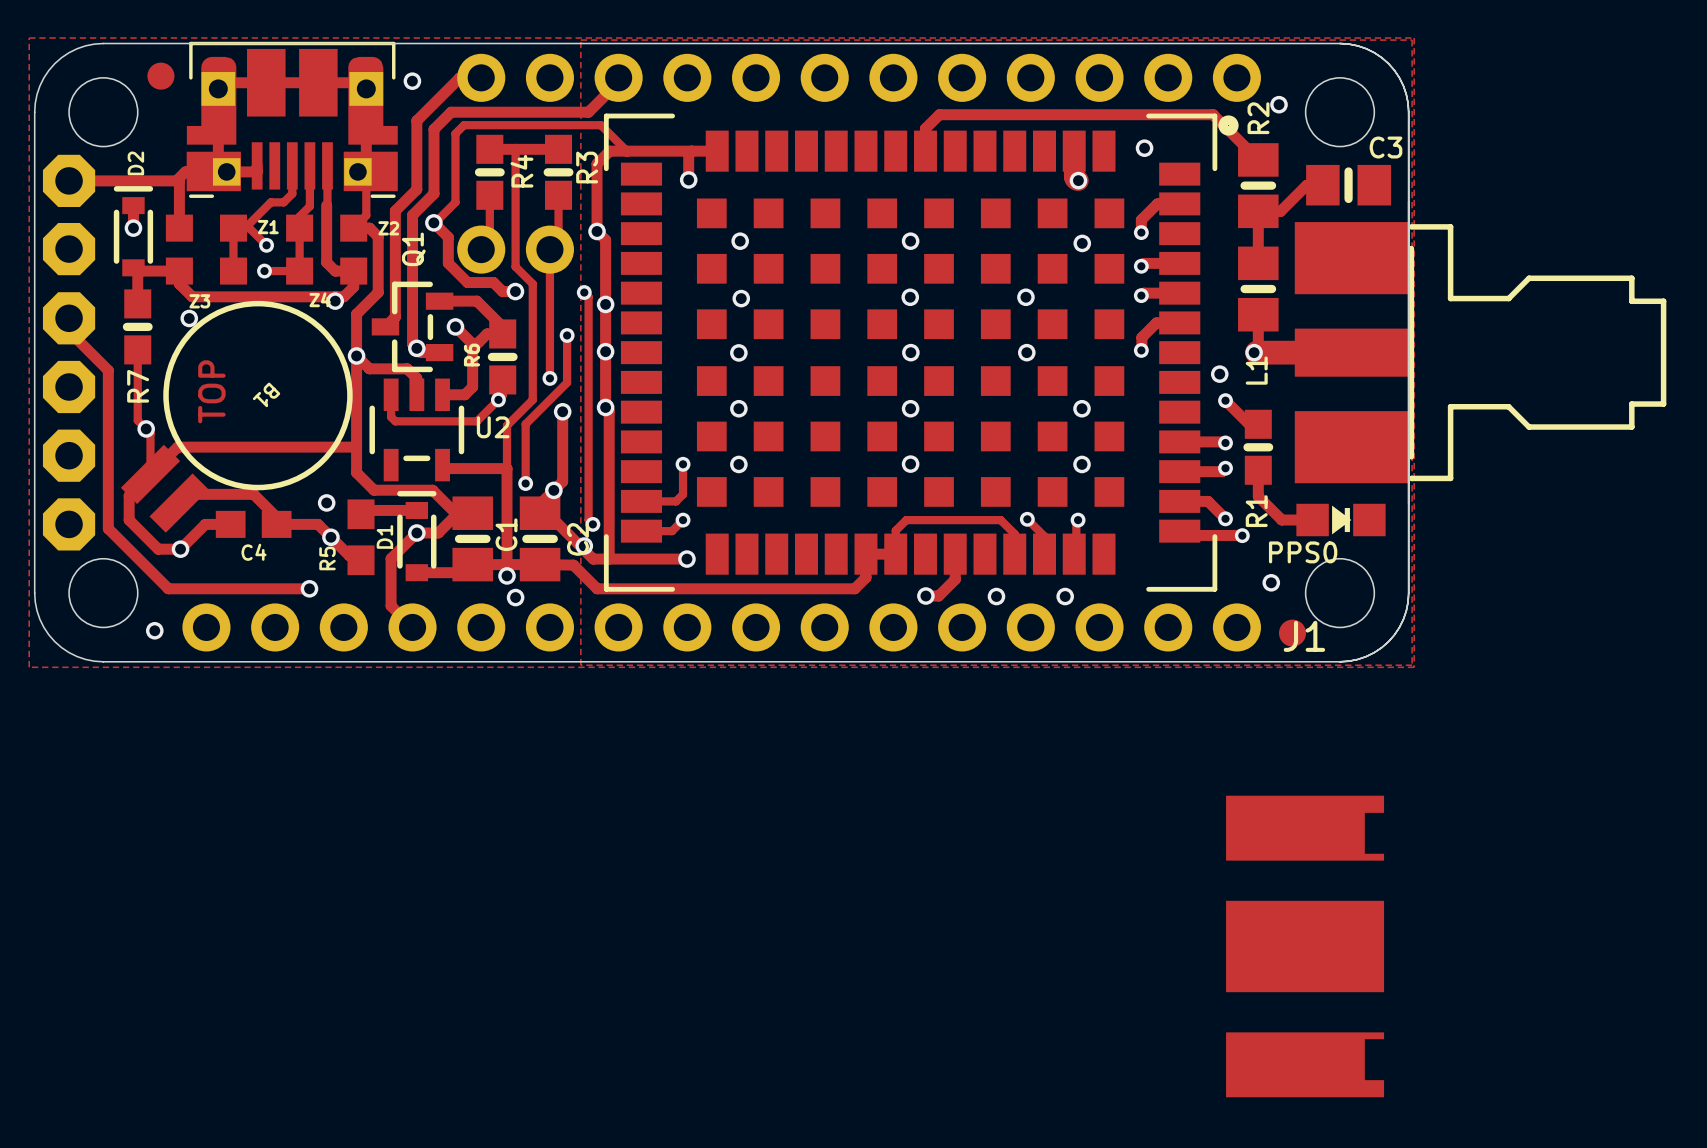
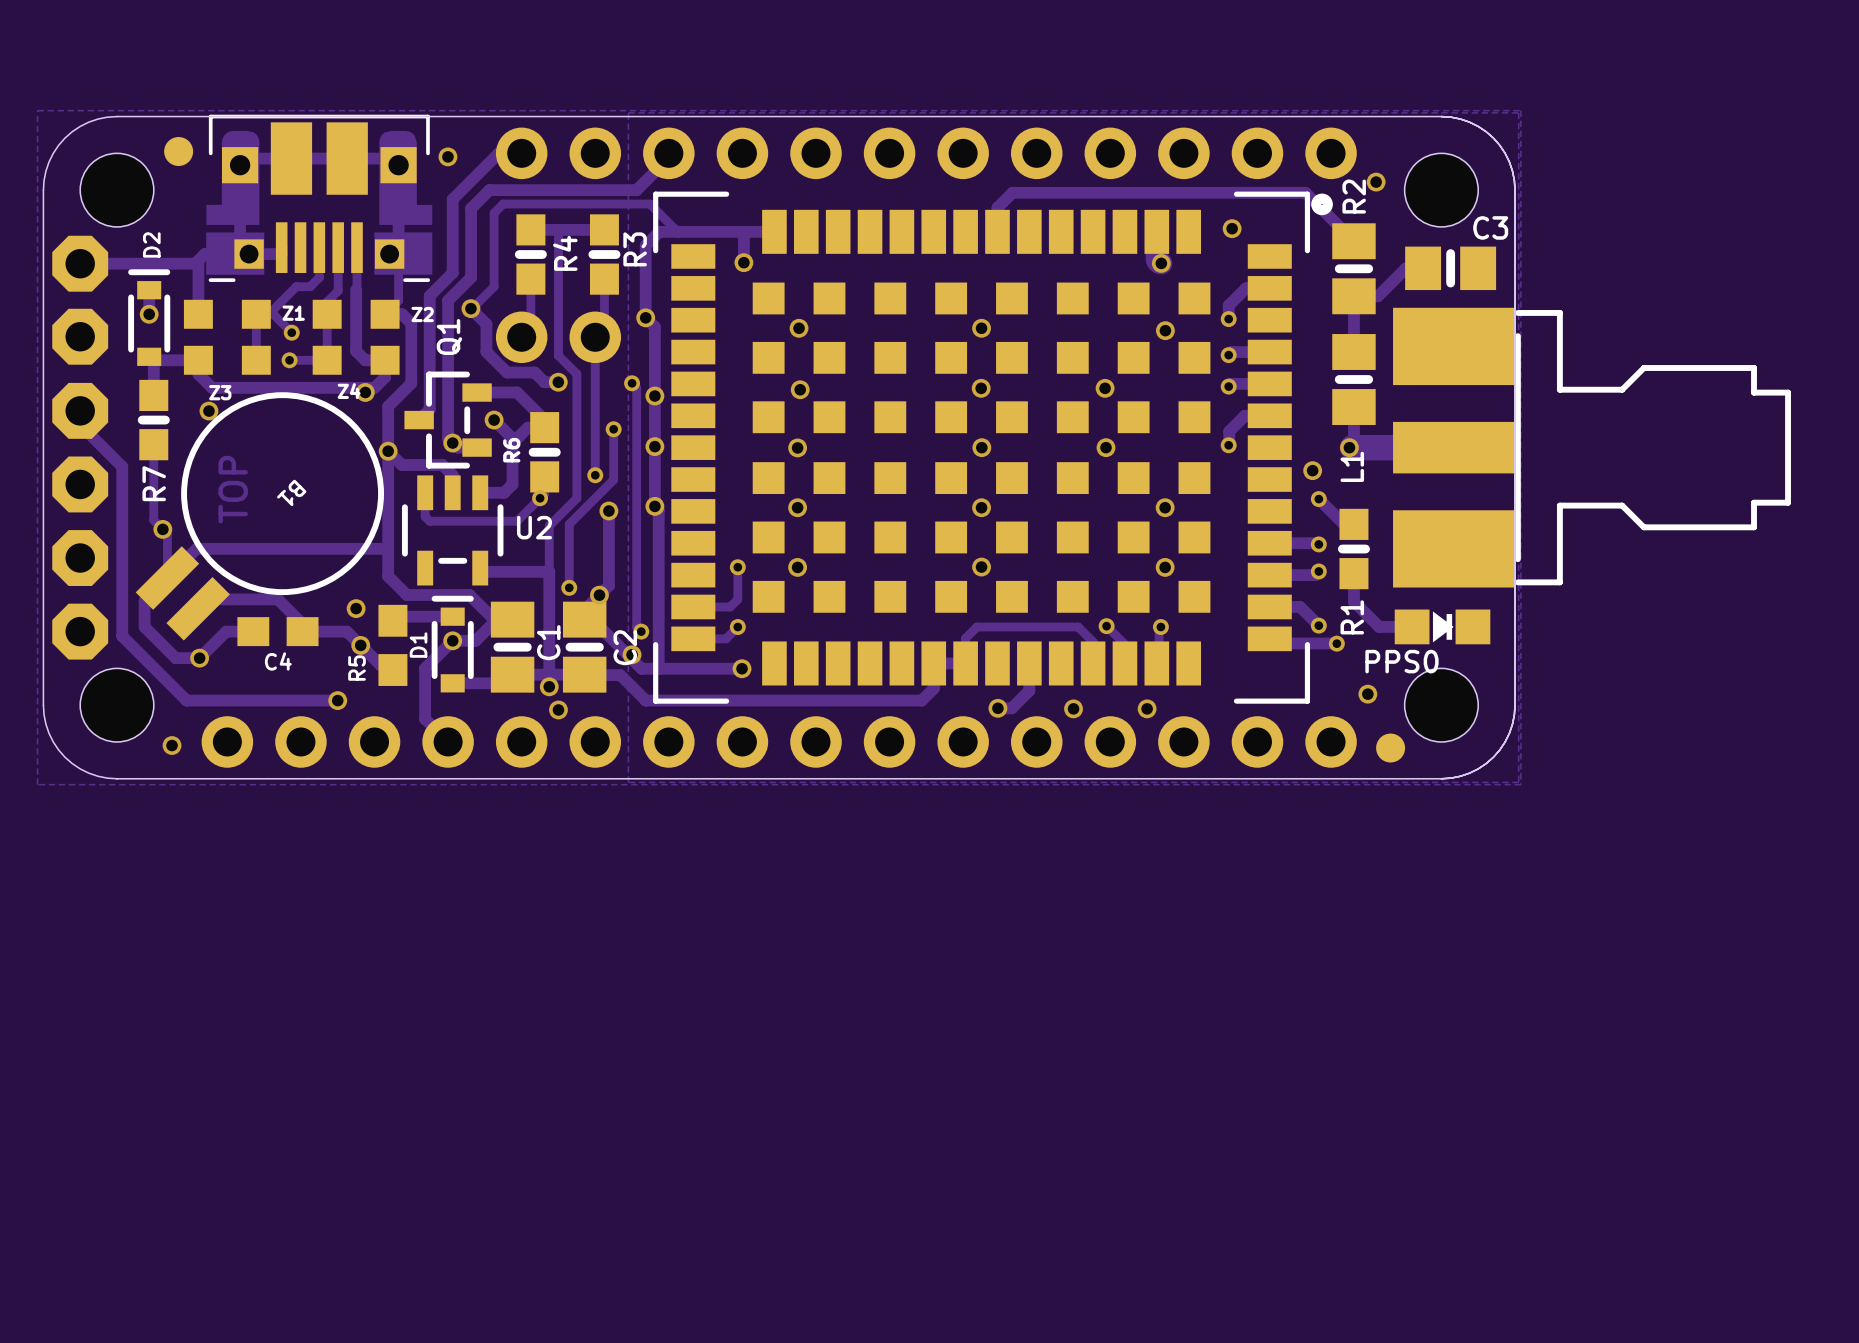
J1: (1305, 946) -> none

